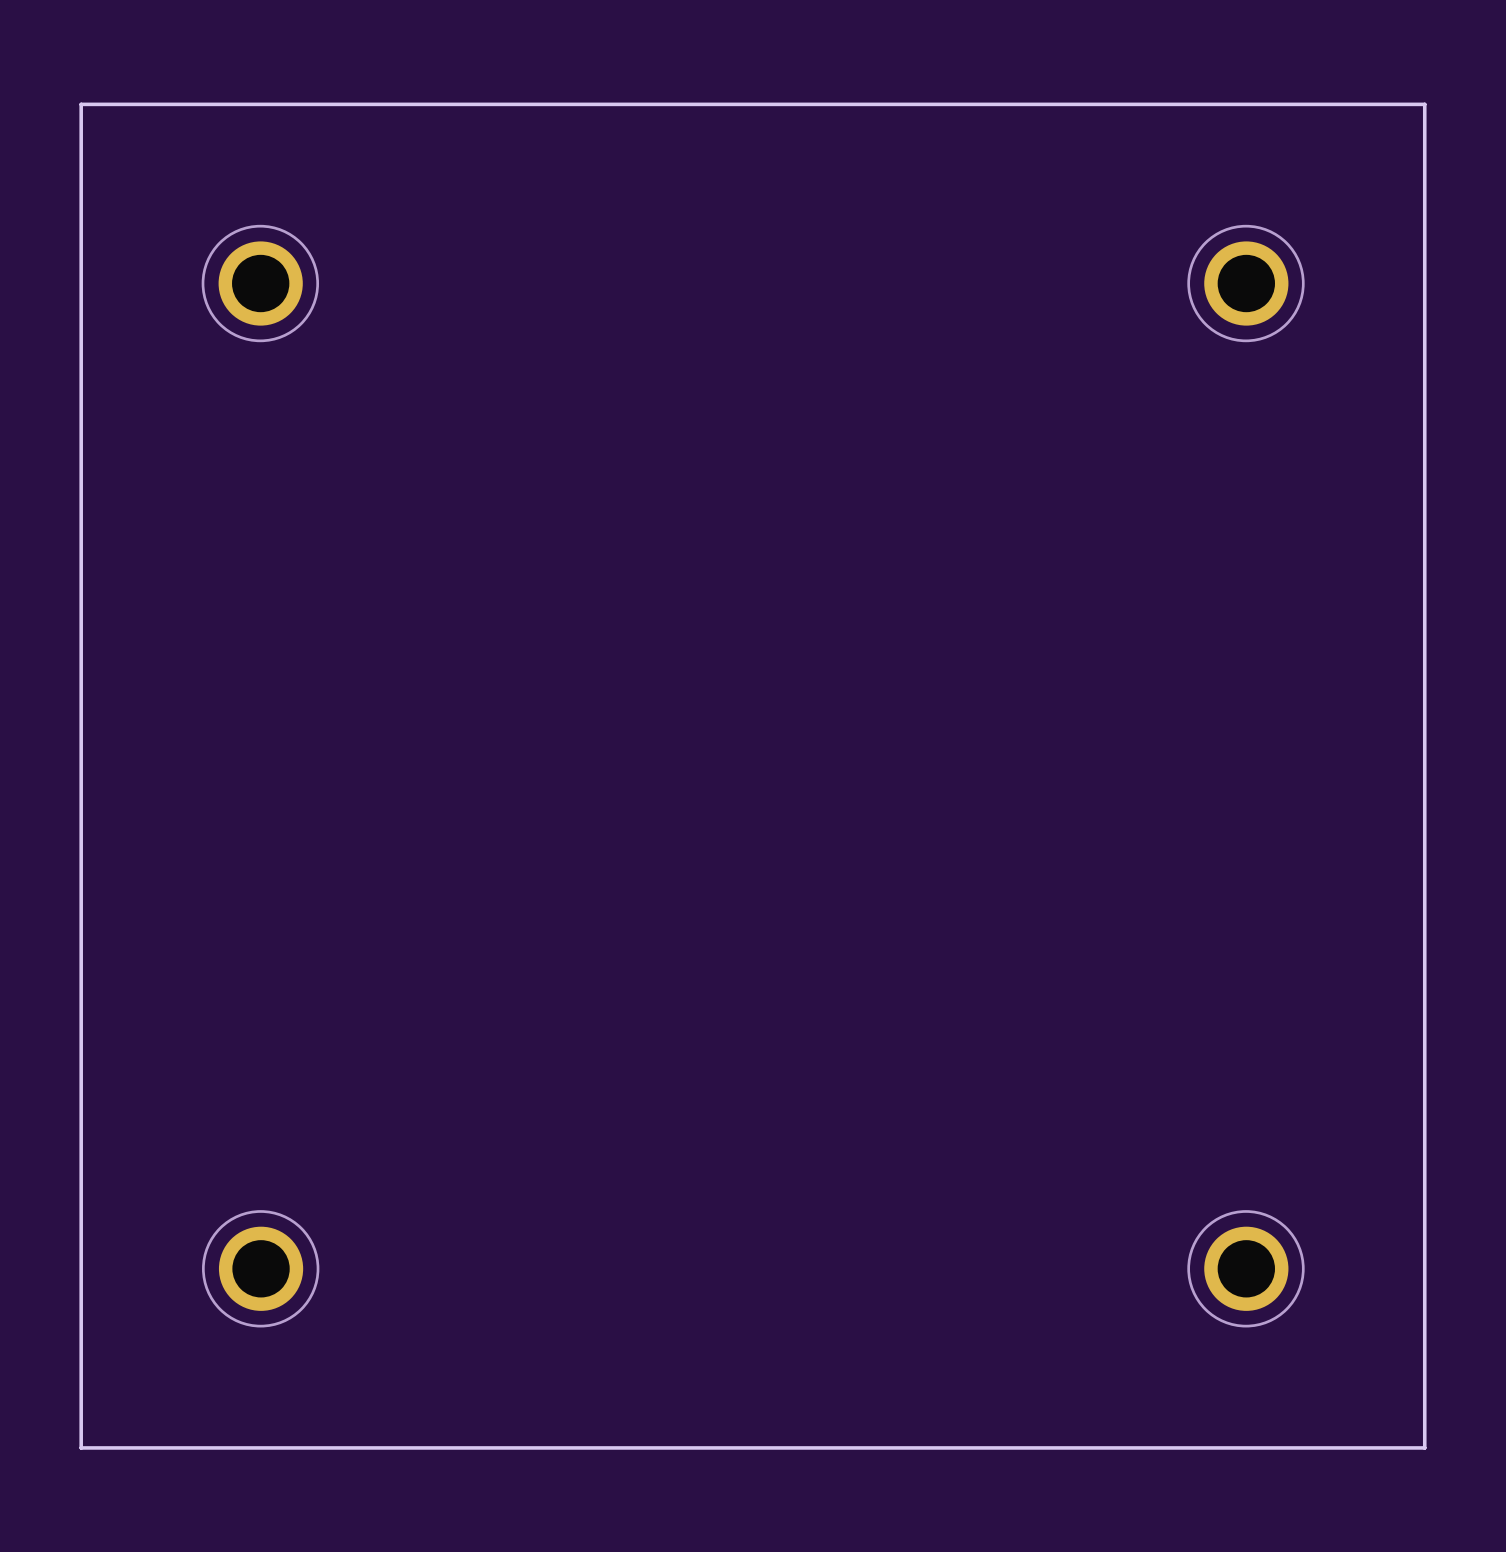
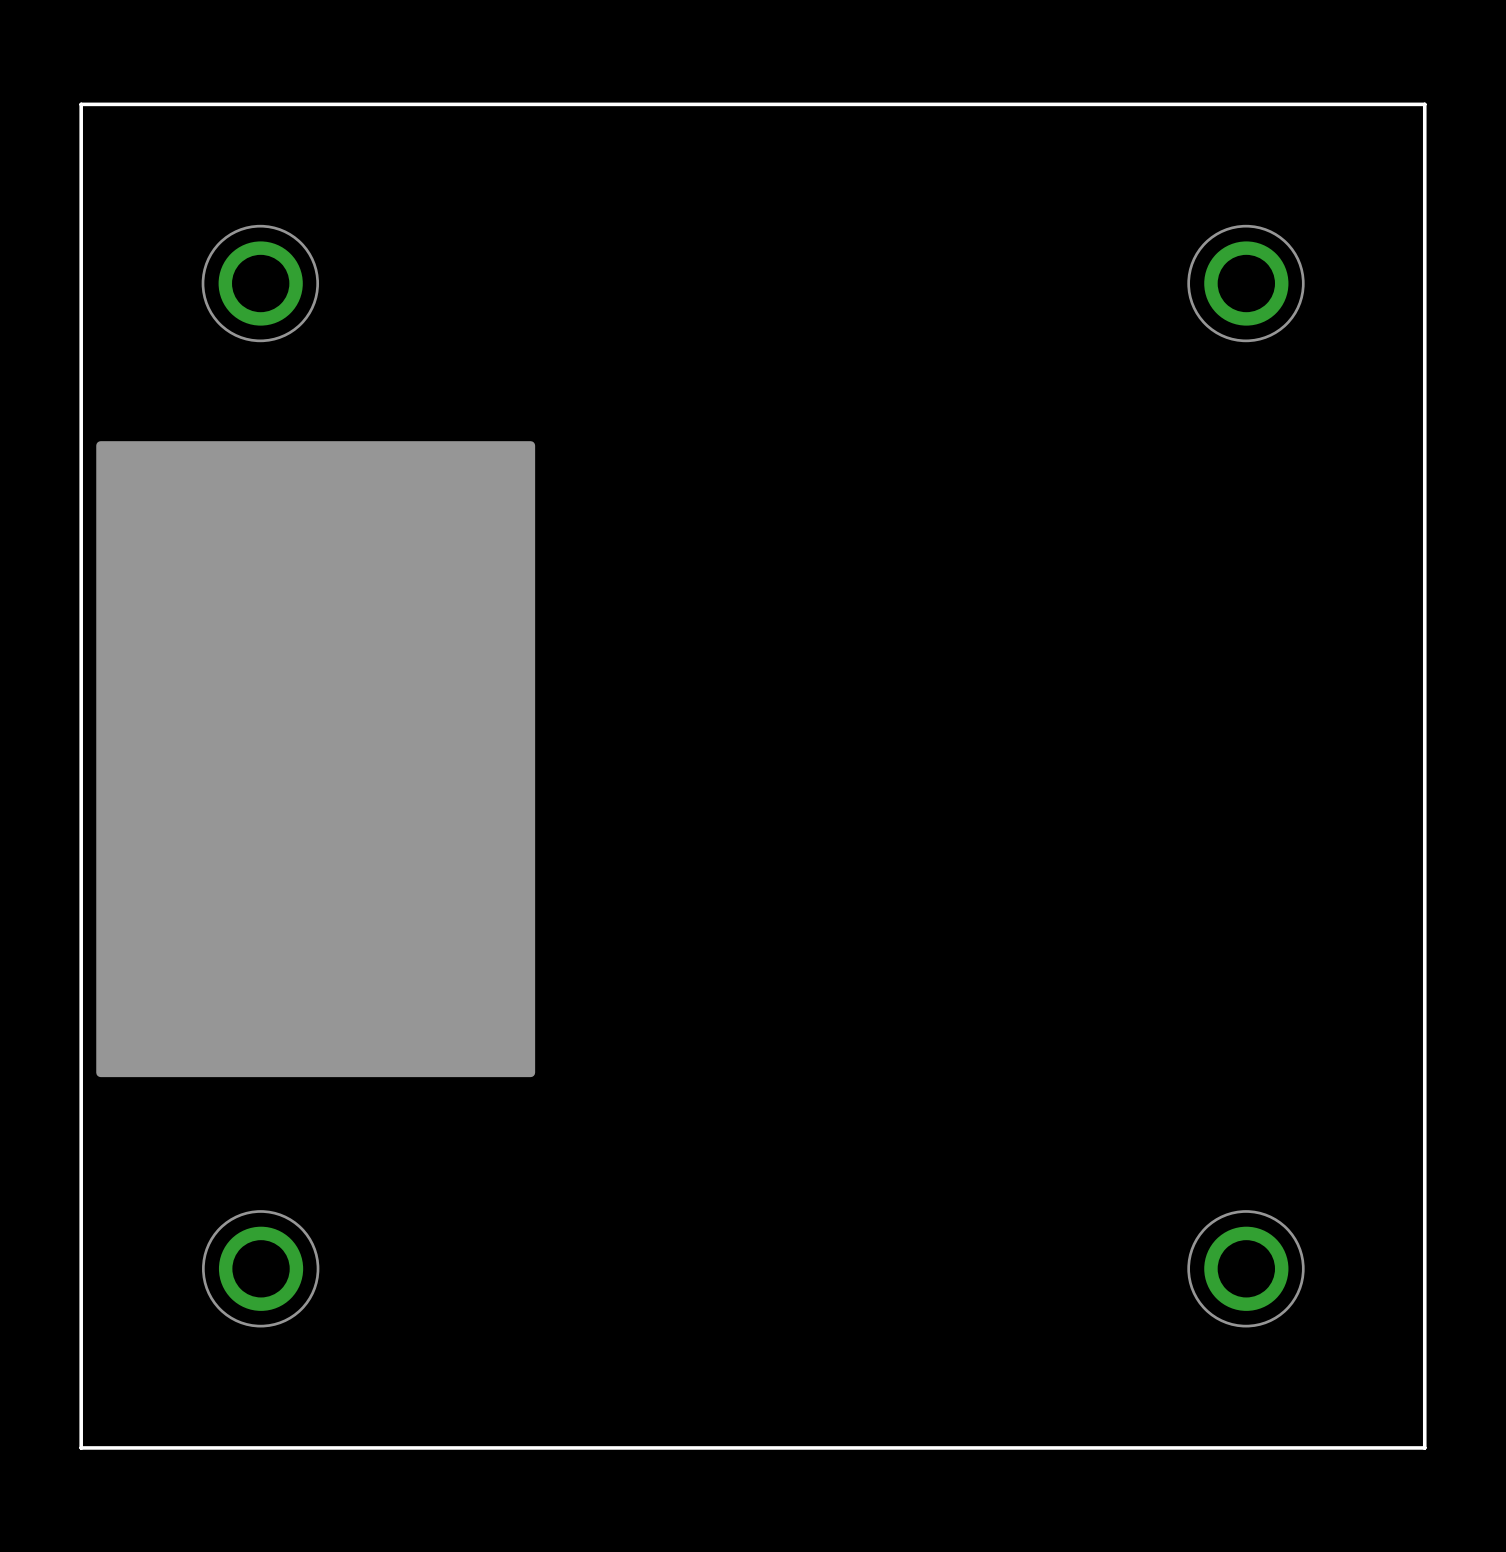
drawing: none -> [96, 441, 536, 1078]

